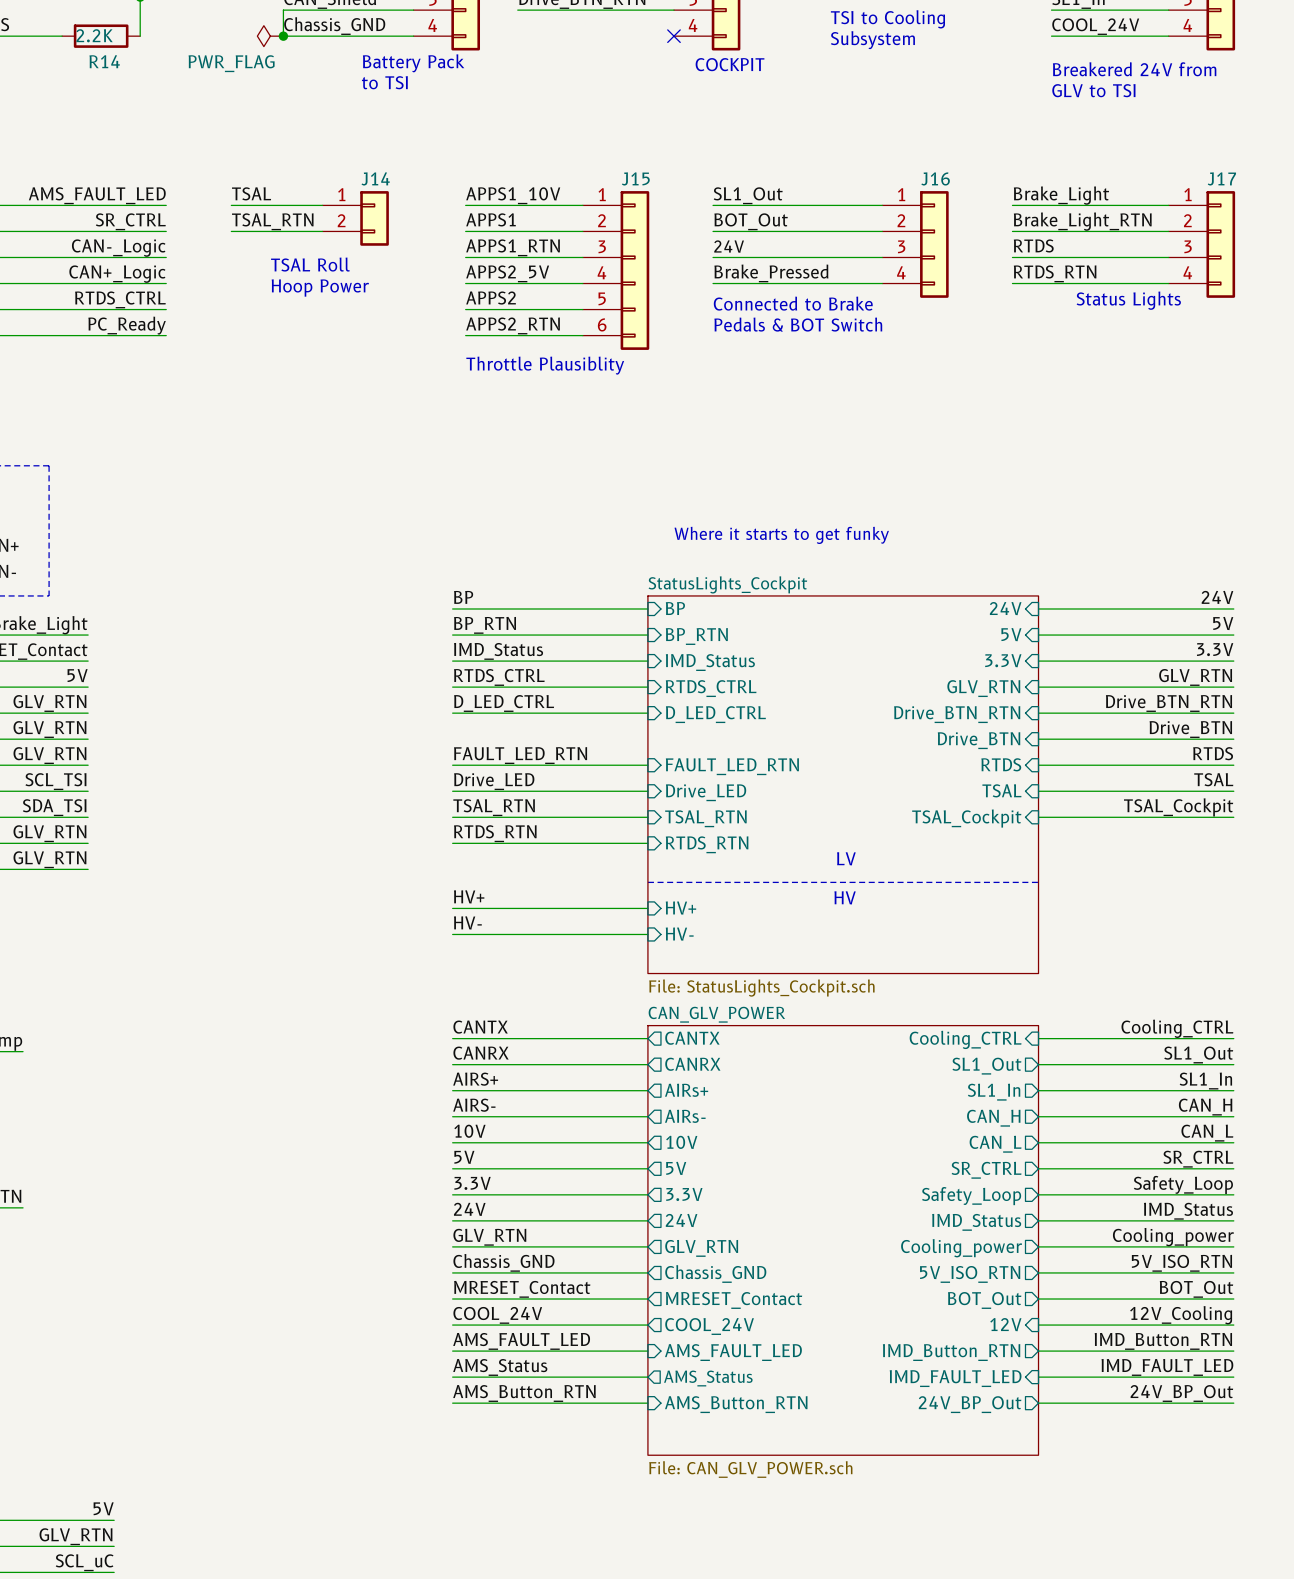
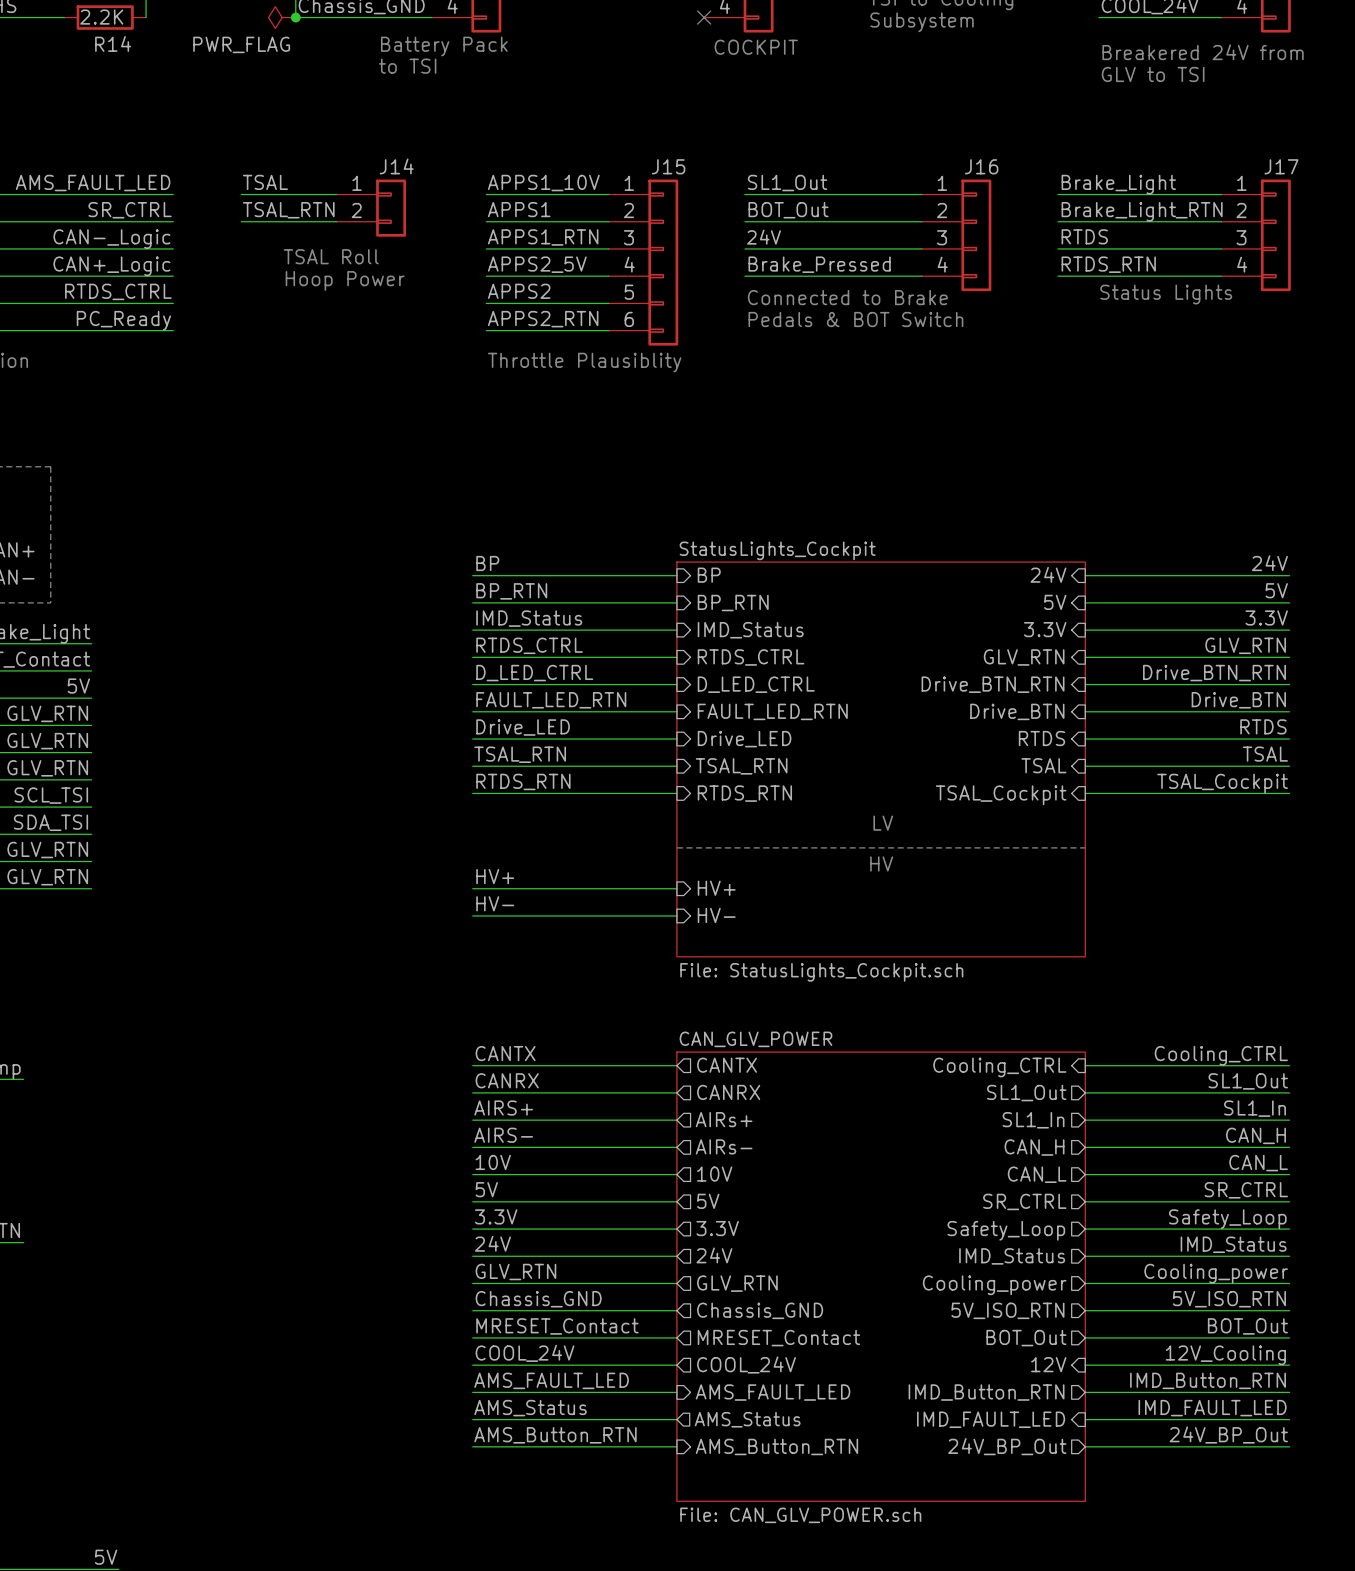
text: Where it starts to get funky (781, 535) -> none
label position: BP (463, 597) -> BP (487, 563)
label position: 24V (1217, 597) -> 24V (1269, 563)
wire: (452, 608) (647, 608) -> (472, 575) (676, 575)
sheet pin position: BP (675, 608) -> BP (709, 575)
sheet pin position: 24V (1005, 608) -> 24V (1048, 574)
wire: (1038, 608) (1233, 608) -> (1085, 575) (1289, 575)
label position: 5V (1223, 623) -> 5V (1276, 590)
label position: BP_RTN (485, 625) -> BP_RTN (511, 591)
sheet pin position: 5V (1011, 634) -> 5V (1055, 602)
wire: (452, 635) (647, 635) -> (472, 602) (676, 602)
wire: (1038, 635) (1233, 635) -> (1085, 602) (1289, 602)
sheet pin position: BP_RTN (696, 636) -> BP_RTN (733, 603)
label position: 3.3V (1215, 649) -> 3.3V (1266, 617)
label position: IMD_Status (498, 651) -> IMD_Status (529, 618)
sheet pin position: 3.3V (1003, 660) -> 3.3V (1045, 629)
wire: (452, 661) (647, 661) -> (472, 630) (676, 630)
wire: (1038, 661) (1233, 661) -> (1085, 630) (1289, 630)
sheet pin position: IMD_Status (710, 662) -> IMD_Status (750, 630)
label position: RTDS_CTRL (499, 677) -> RTDS_CTRL (529, 645)
label position: GLV_RTN (1195, 677) -> GLV_RTN (1245, 645)
wire: (452, 687) (647, 687) -> (472, 657) (676, 657)
wire: (1038, 687) (1233, 687) -> (1085, 657) (1289, 657)
sheet pin position: RTDS_CTRL (711, 688) -> RTDS_CTRL (751, 657)
sheet pin position: GLV_RTN (983, 688) -> GLV_RTN (1024, 657)
label position: D_LED_CTRL (504, 703) -> D_LED_CTRL (534, 673)
label position: Drive_BTN_RTN (1168, 703) -> Drive_BTN_RTN (1214, 673)
wire: (452, 713) (647, 713) -> (472, 684) (676, 684)
wire: (1038, 713) (1233, 713) -> (1085, 684) (1289, 684)
sheet pin position: D_LED_CTRL (715, 714) -> D_LED_CTRL (756, 684)
sheet pin position: Drive_BTN_RTN (957, 714) -> Drive_BTN_RTN (993, 684)
label position: Drive_BTN (1190, 729) -> Drive_BTN (1238, 700)
wire: (1038, 739) (1233, 739) -> (1085, 711) (1289, 711)
sheet pin position: Drive_BTN (979, 740) -> Drive_BTN (1017, 711)
label position: RTDS (1213, 753) -> RTDS (1263, 726)
label position: FAULT_LED_RTN (520, 755) -> FAULT_LED_RTN (551, 700)
sheet pin position: RTDS (1001, 764) -> RTDS (1041, 738)
wire: (452, 765) (647, 765) -> (472, 739) (676, 739)
wire: (1038, 765) (1233, 765) -> (1085, 739) (1289, 739)
sheet pin position: FAULT_LED_RTN (732, 766) -> FAULT_LED_RTN (772, 711)
label position: TSAL (1213, 779) -> TSAL (1265, 754)
label position: Drive_LED (494, 781) -> Drive_LED (523, 727)
sheet StatusLights_Cockpit position: (843, 784) -> (881, 759)
sheet pin position: TSAL (1001, 790) -> TSAL (1043, 765)
wire: (452, 791) (647, 791) -> (472, 766) (676, 766)
wire: (1038, 791) (1233, 791) -> (1085, 766) (1289, 766)
sheet pin position: Drive_LED (706, 792) -> Drive_LED (744, 739)
label position: TSAL_RTN (494, 807) -> TSAL_RTN (520, 754)
label position: TSAL_Cockpit (1178, 807) -> TSAL_Cockpit (1222, 783)
wire: (452, 817) (647, 817) -> (472, 793) (676, 793)
wire: (1038, 817) (1233, 817) -> (1085, 793) (1289, 793)
sheet pin position: TSAL_RTN (705, 818) -> TSAL_RTN (741, 766)
sheet pin position: TSAL_Cockpit (966, 818) -> TSAL_Cockpit (1001, 795)
label position: RTDS_RTN (495, 833) -> RTDS_RTN (523, 781)
wire: (452, 843) (647, 843) -> (472, 711) (676, 711)
sheet pin position: RTDS_RTN (707, 844) -> RTDS_RTN (744, 793)
text position: LV (846, 858) -> LV (883, 823)
line: (647, 882) (1038, 882) -> (676, 847) (1085, 847)
label position: HV+ (469, 896) -> HV+ (495, 876)
text position: HV (845, 897) -> HV (881, 863)
wire: (452, 908) (647, 908) -> (472, 888) (676, 888)
sheet pin position: HV+ (680, 908) -> HV+ (716, 888)
label position: HV- (467, 922) -> HV- (495, 903)
wire: (452, 934) (647, 934) -> (472, 915) (676, 915)
sheet pin position: HV- (679, 934) -> HV- (716, 915)

